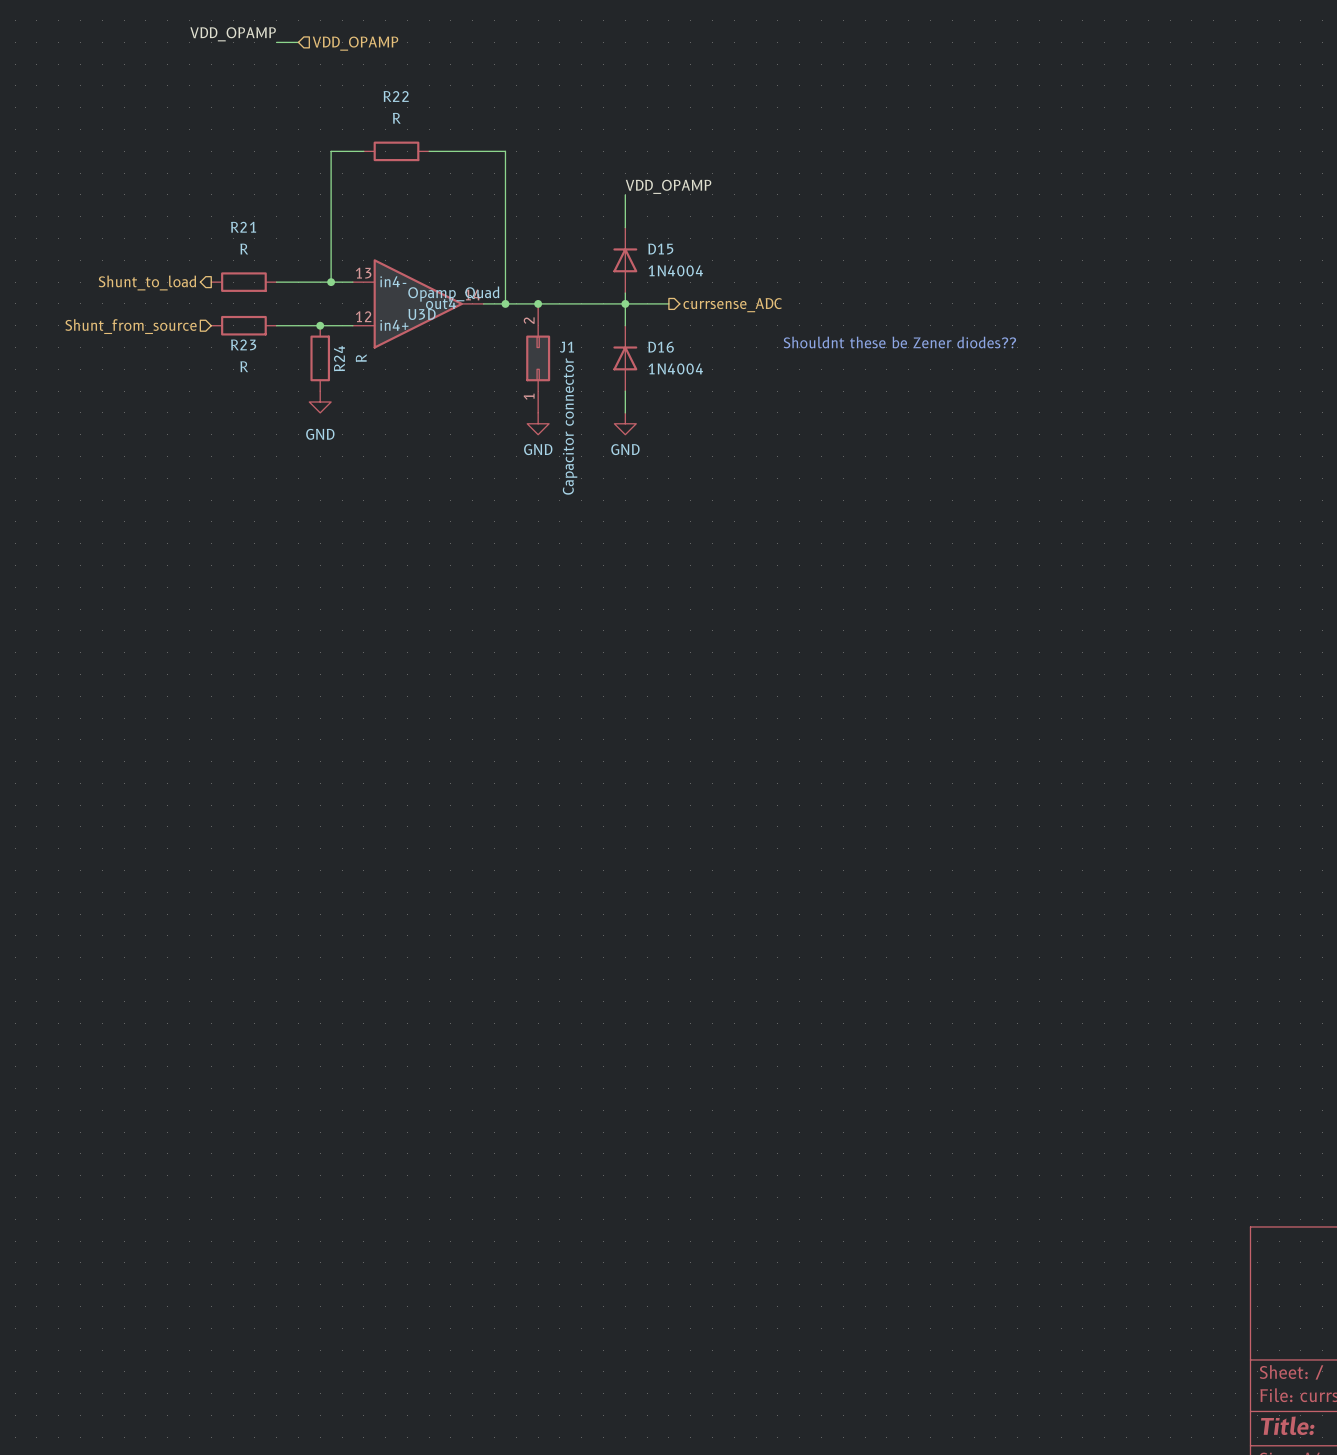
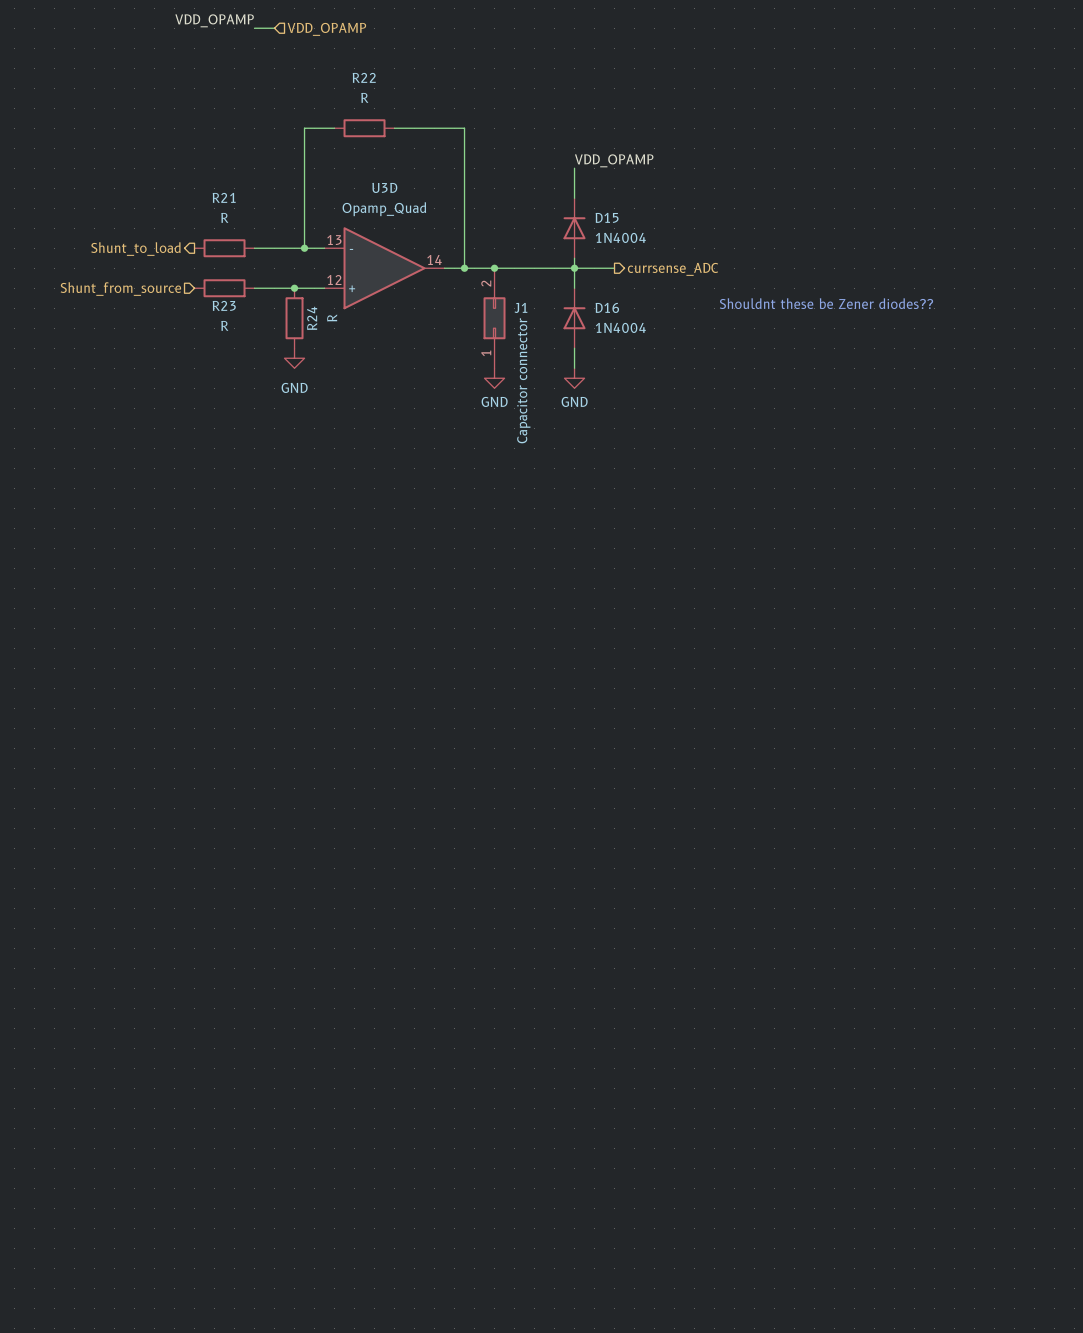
U3D pin name: in4- (393, 281) -> - (351, 249)
U3D value position: Opamp_Quad (453, 294) -> Opamp_Quad (384, 209)
U3D pin name: out4 (441, 303) -> none
U3D name position: U3D (422, 314) -> U3D (384, 187)
U3D pin name: in4+ (394, 325) -> + (352, 288)

